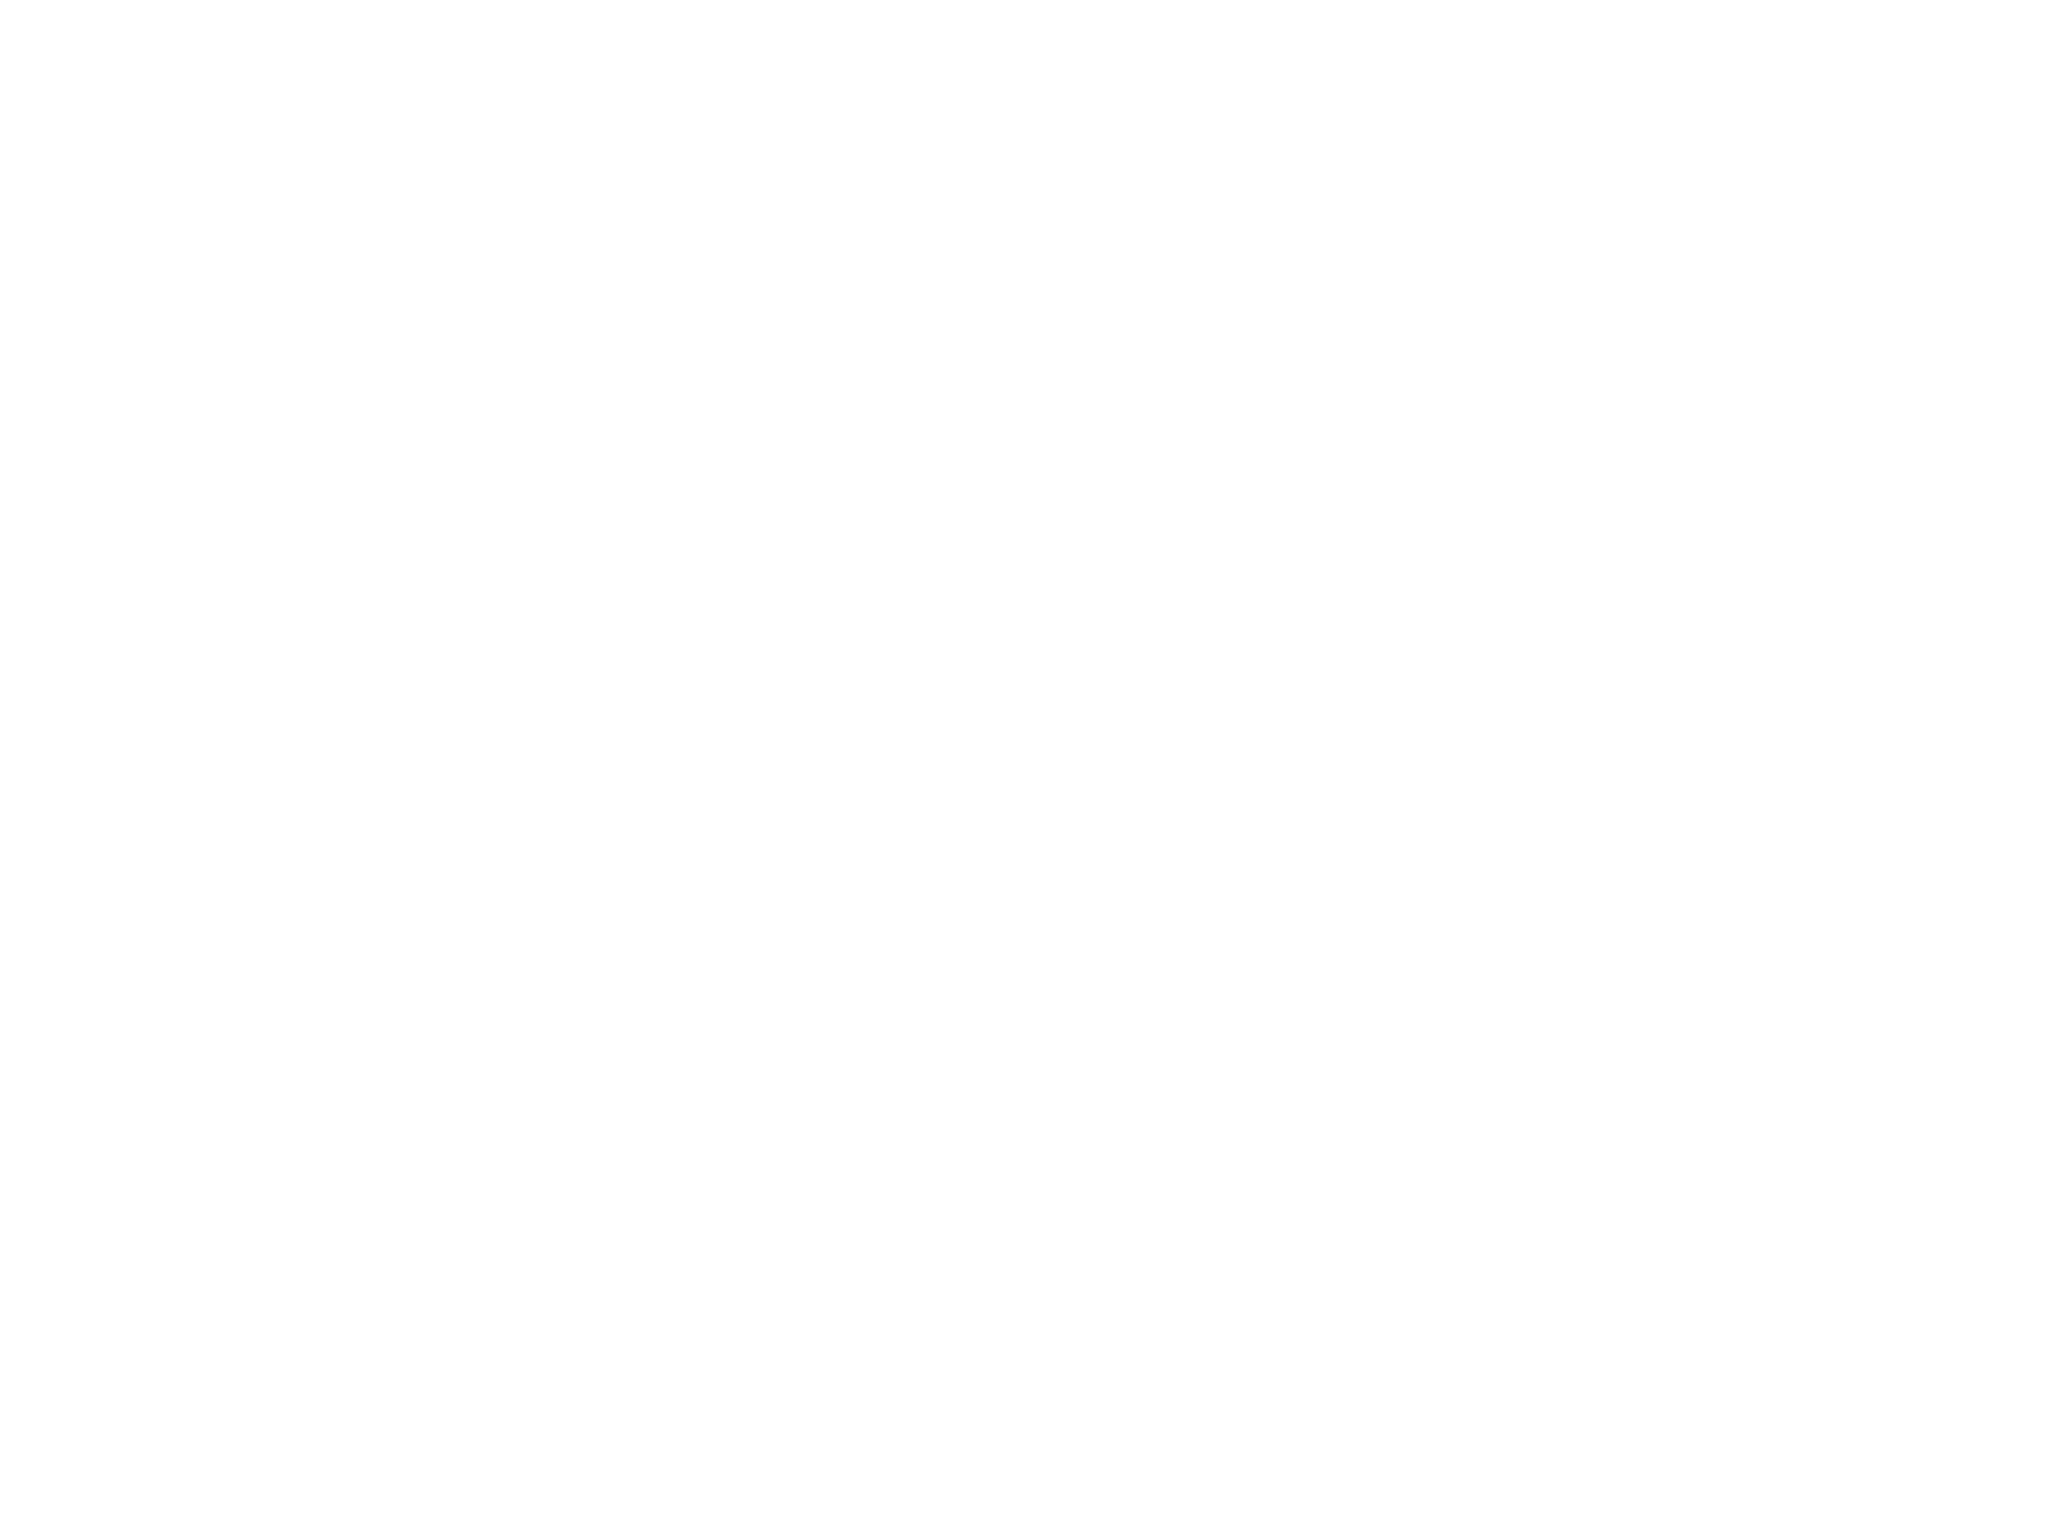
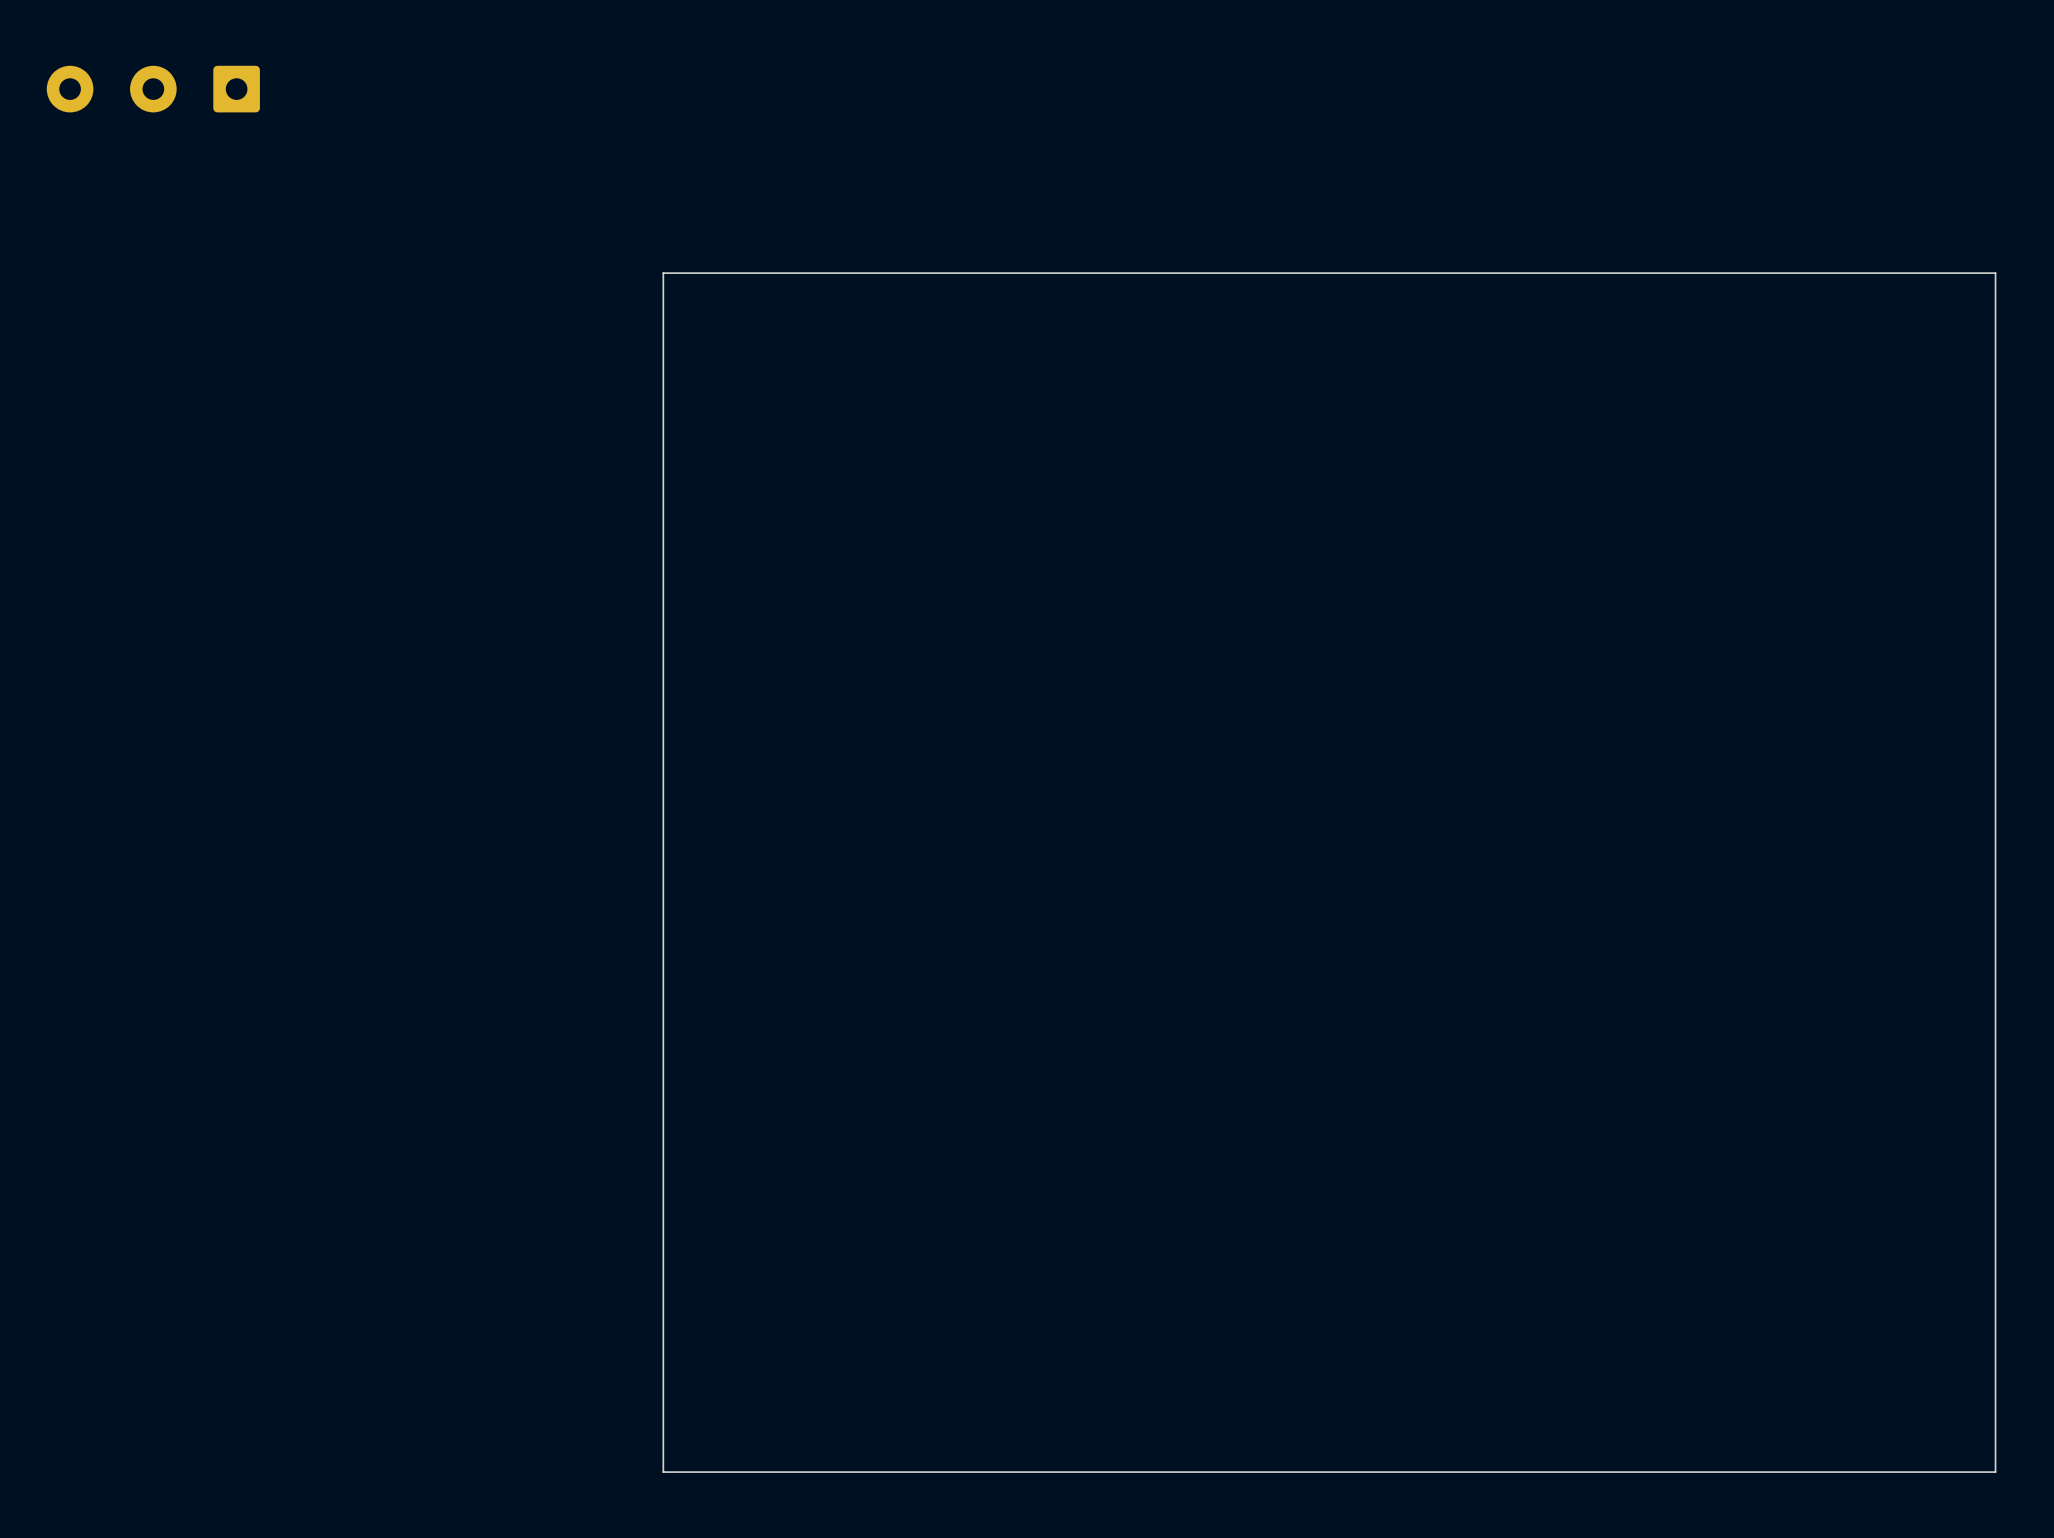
part: none -> (153, 89)
board edge: none -> (1995, 273) (663, 273) (663, 1472) (1995, 1472) (1995, 273)

